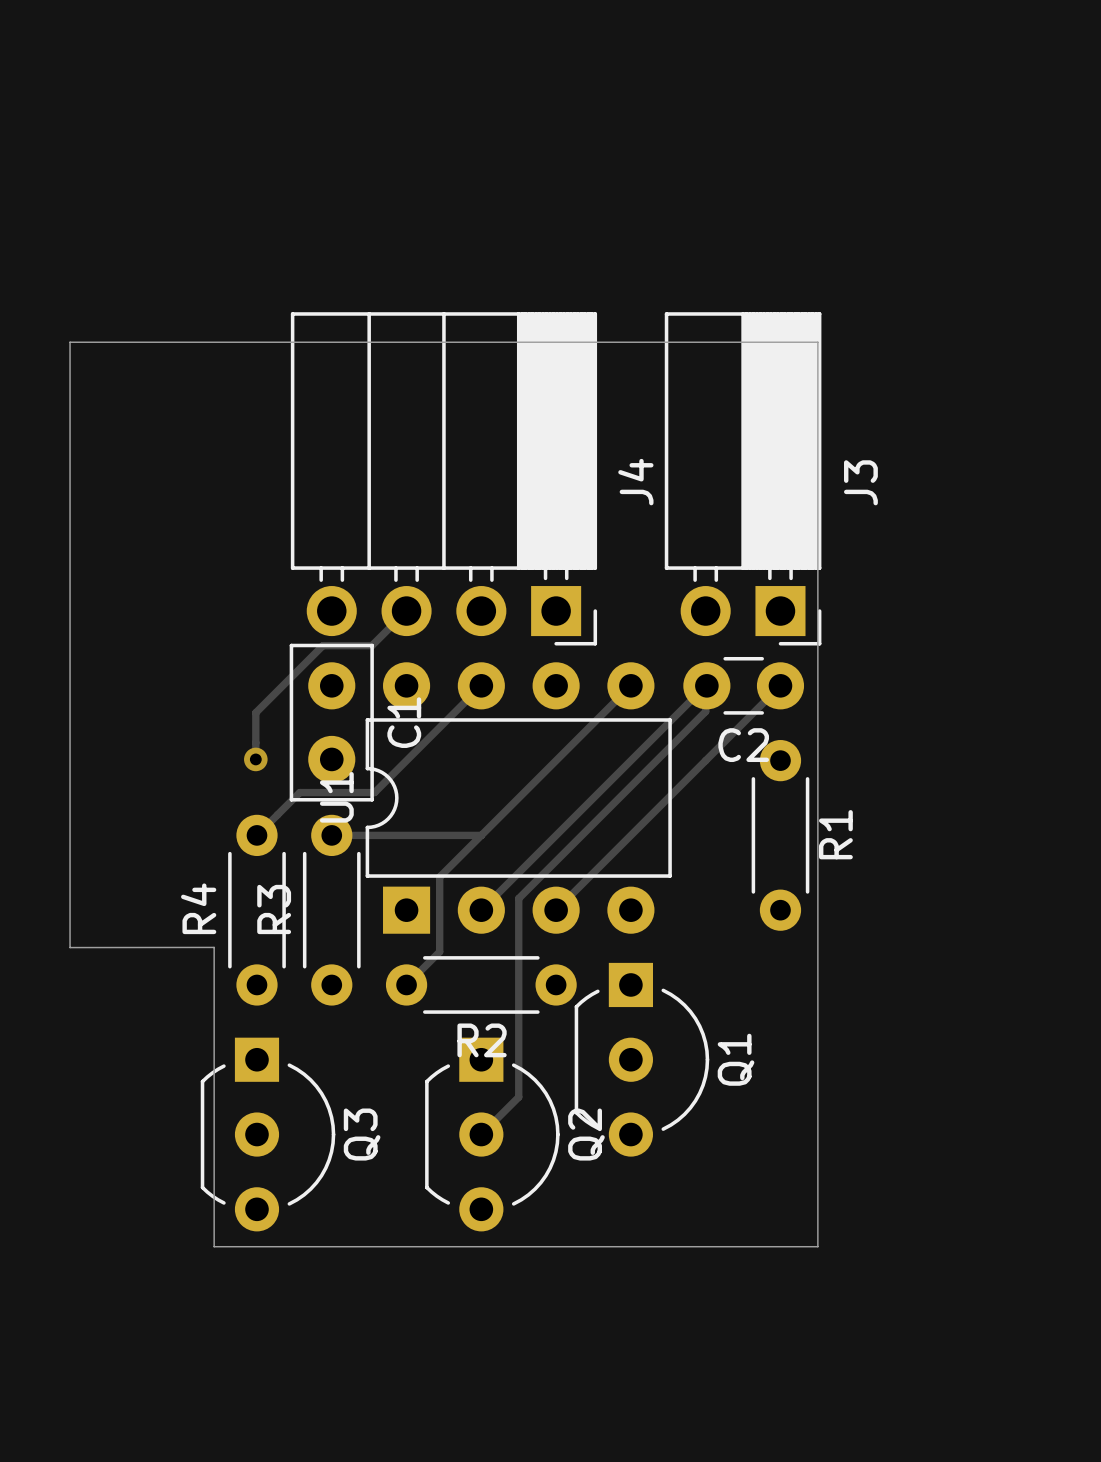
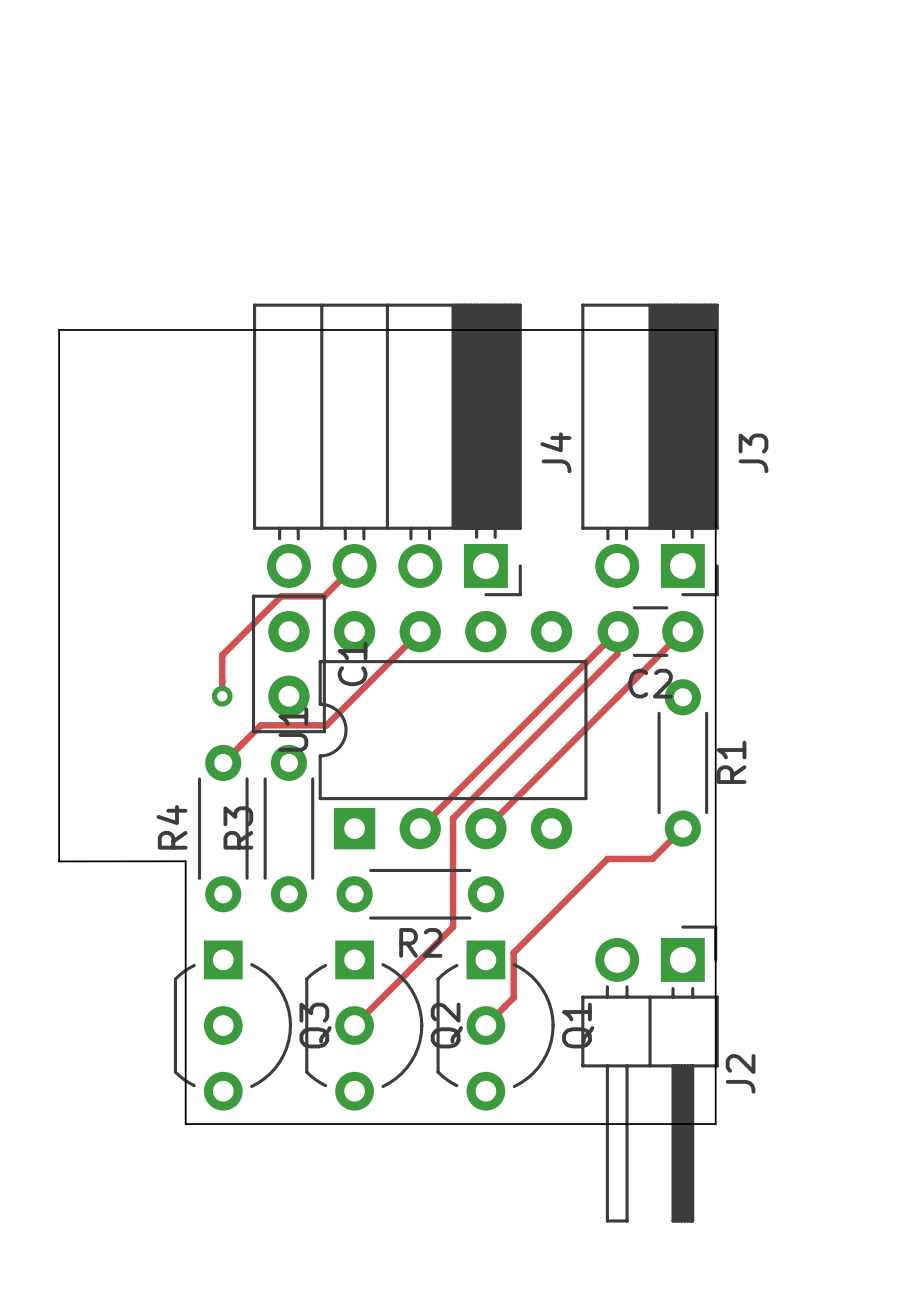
track: (630, 685) (439, 877) (439, 951) (406, 984) -> none
track: (331, 835) (481, 835) -> none
track: none -> (682, 828) (652, 858) (607, 858) (513, 952) (513, 997) (485, 1025)
track: (518, 1022) (518, 1097) (481, 1134) -> (453, 927) (354, 1025)
Q1 position: (641, 1059) -> (495, 1025)
Q2 position: (492, 1134) -> (364, 1025)
J2: none -> (650, 1074)

